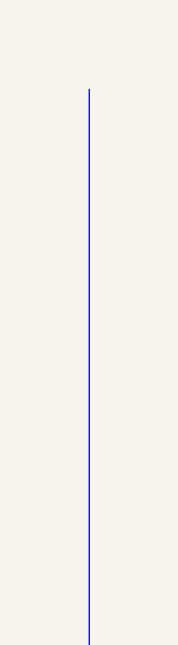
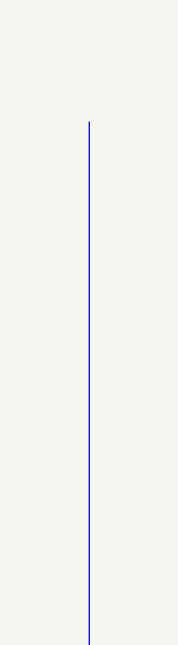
line: (89, 89) (89, 121) -> none

